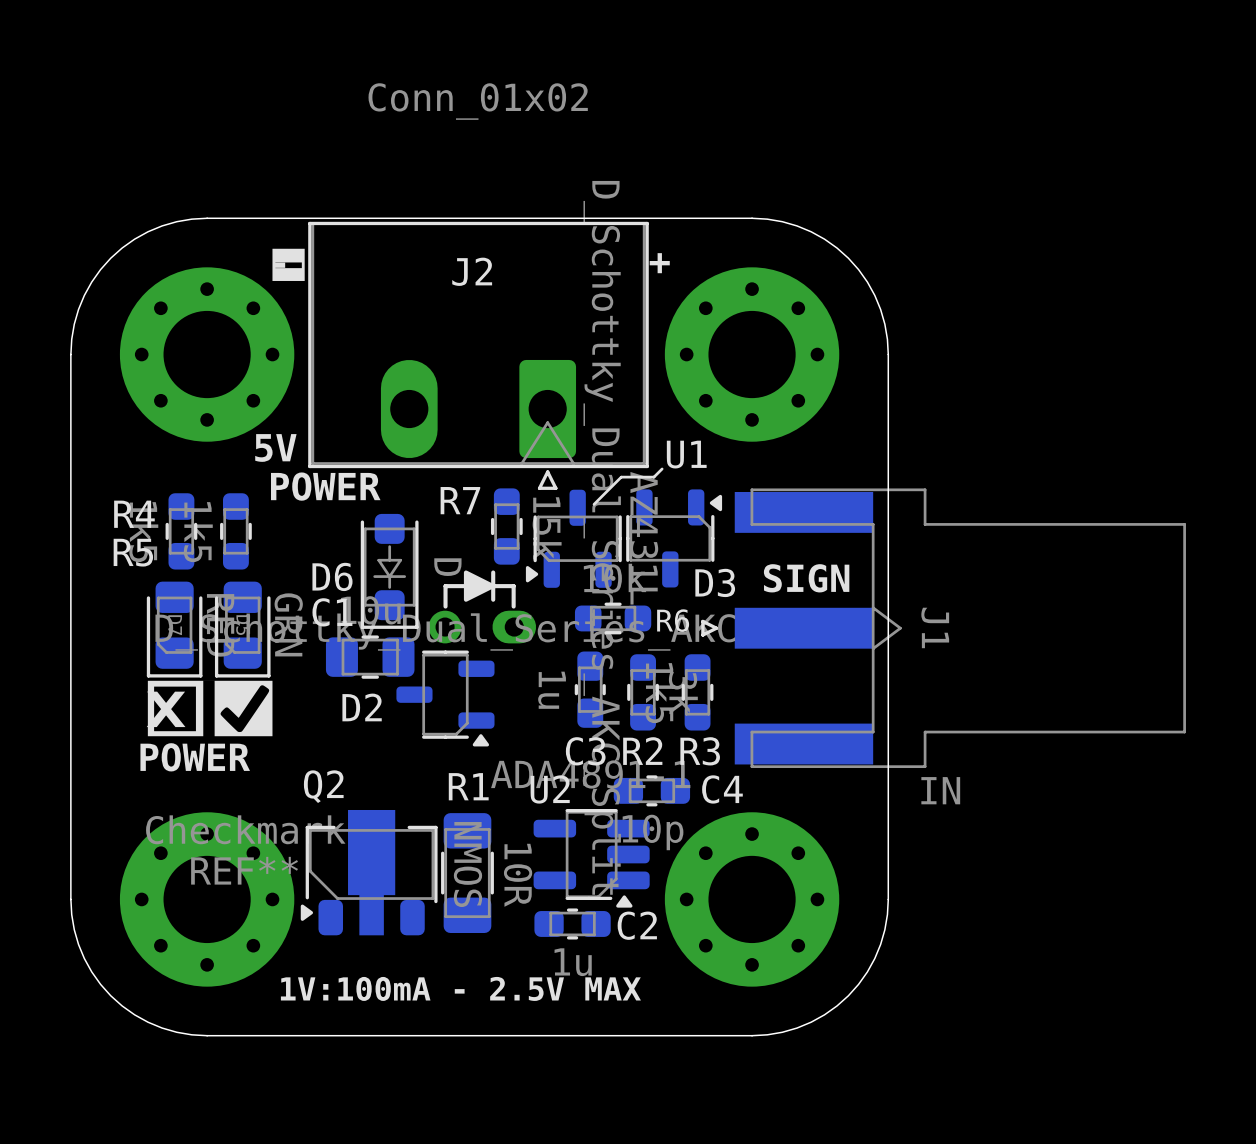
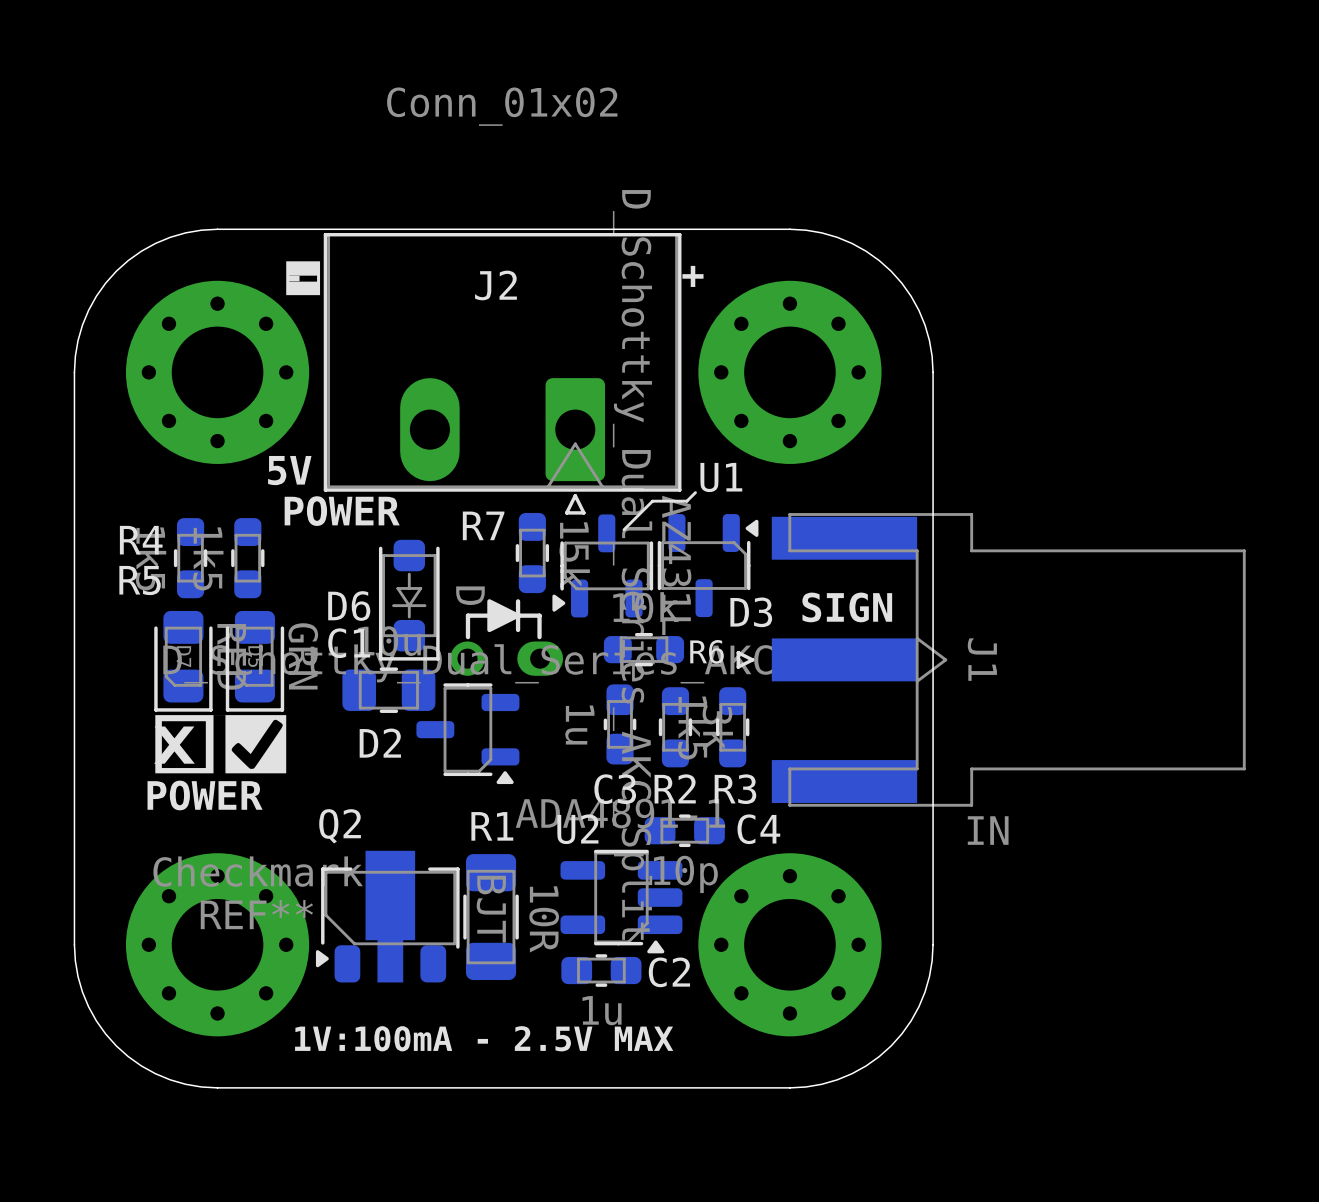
Q2 value: NMOS (467, 864) -> BJT (491, 909)

